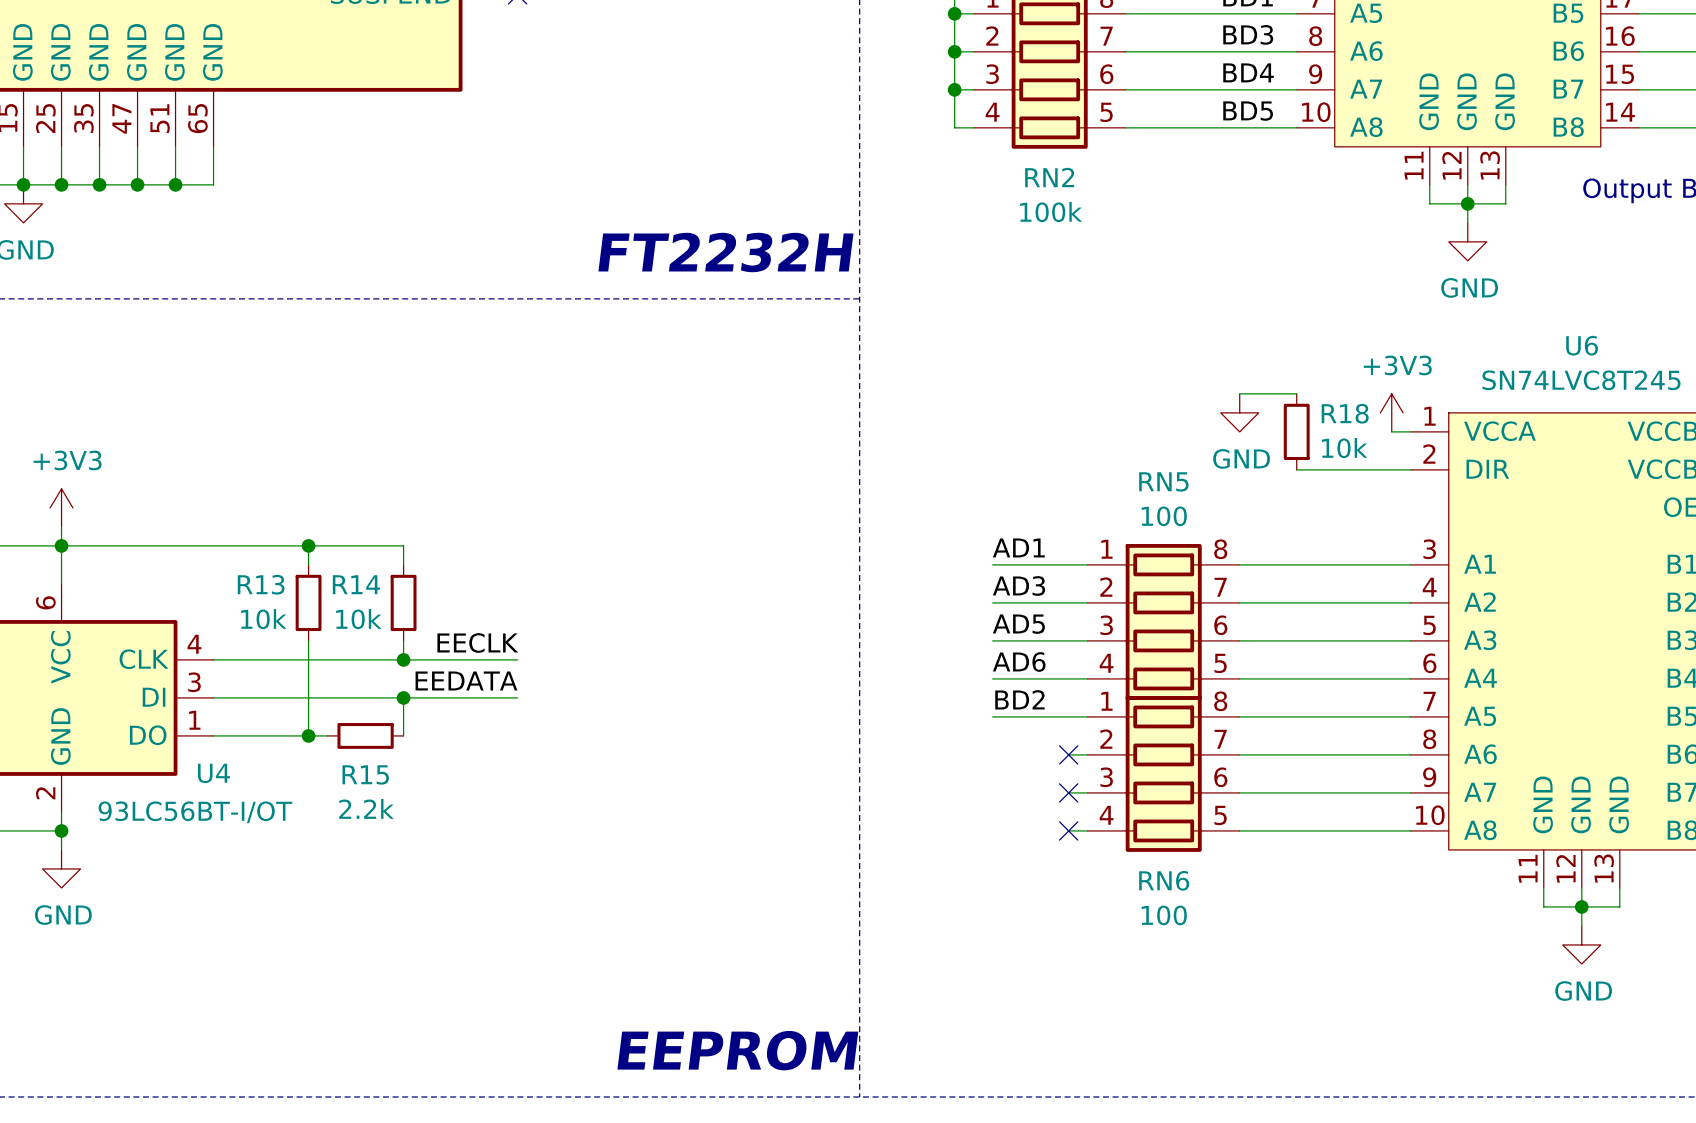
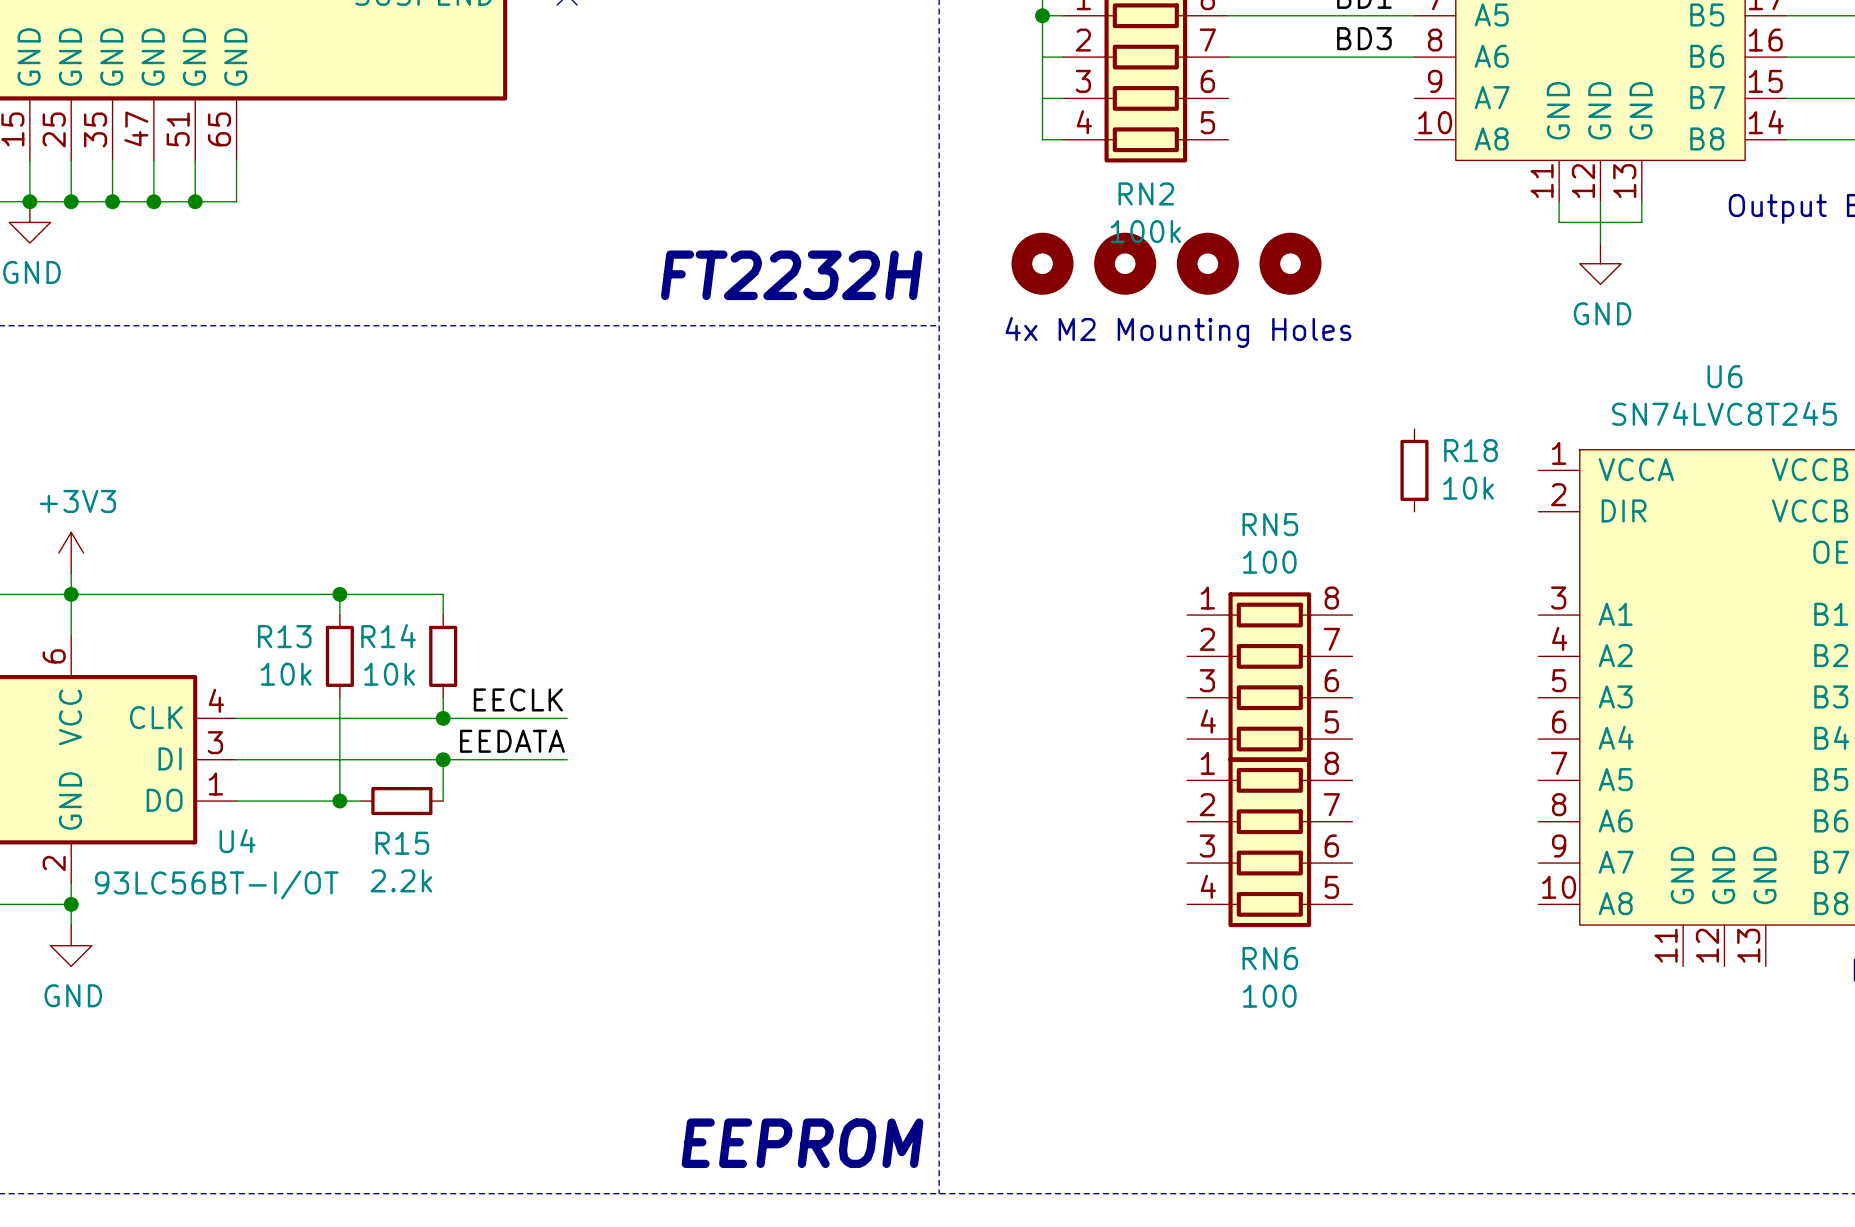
junction: (954, 51) -> none
label: BD4 (1248, 72) -> none
junction: (954, 89) -> none
wire: (1125, 89) (1296, 89) -> none
label: BD5 (1248, 111) -> none
wire: (1125, 127) (1296, 127) -> none
junction: (1467, 203) -> none
part: none -> (1042, 263)
part: none -> (1125, 263)
part: none -> (1207, 263)
part: none -> (1290, 263)
text: none -> 4x M2 Mounting Holes (1178, 332)
wire: (1239, 393) (1296, 393) -> none
power symbol: GND (1239, 412) -> none
power symbol: +3V3 (1391, 412) -> none
wire: (1391, 431) (1410, 431) -> none
wire: (1296, 469) (1410, 469) -> none
label: AD1 (1018, 547) -> none
wire: (992, 564) (1087, 564) -> none
wire: (1239, 564) (1410, 564) -> none
label: AD3 (1018, 585) -> none
wire: (992, 602) (1087, 602) -> none
wire: (1239, 602) (1410, 602) -> none
label: AD5 (1018, 624) -> none
wire: (992, 640) (1087, 640) -> none
wire: (1239, 640) (1410, 640) -> none
label: AD6 (1019, 661) -> none
wire: (992, 678) (1087, 678) -> none
wire: (1239, 678) (1410, 678) -> none
label: BD2 (1019, 699) -> none
wire: (992, 716) (1087, 716) -> none
wire: (1239, 716) (1410, 716) -> none
wire: (1068, 754) (1087, 754) -> none
no-connect mark: (1068, 754) -> none
wire: (1239, 754) (1410, 754) -> none
wire: (1068, 792) (1087, 792) -> none
no-connect mark: (1068, 792) -> none
wire: (1239, 792) (1410, 792) -> none
wire: (1068, 830) (1087, 830) -> none
no-connect mark: (1068, 830) -> none
wire: (1239, 830) (1410, 830) -> none
wire: (1543, 887) (1543, 906) (1619, 906) (1619, 887) -> none
wire: (1581, 887) (1581, 925) -> none
junction: (1581, 906) -> none
power symbol: GND (1581, 944) -> none

